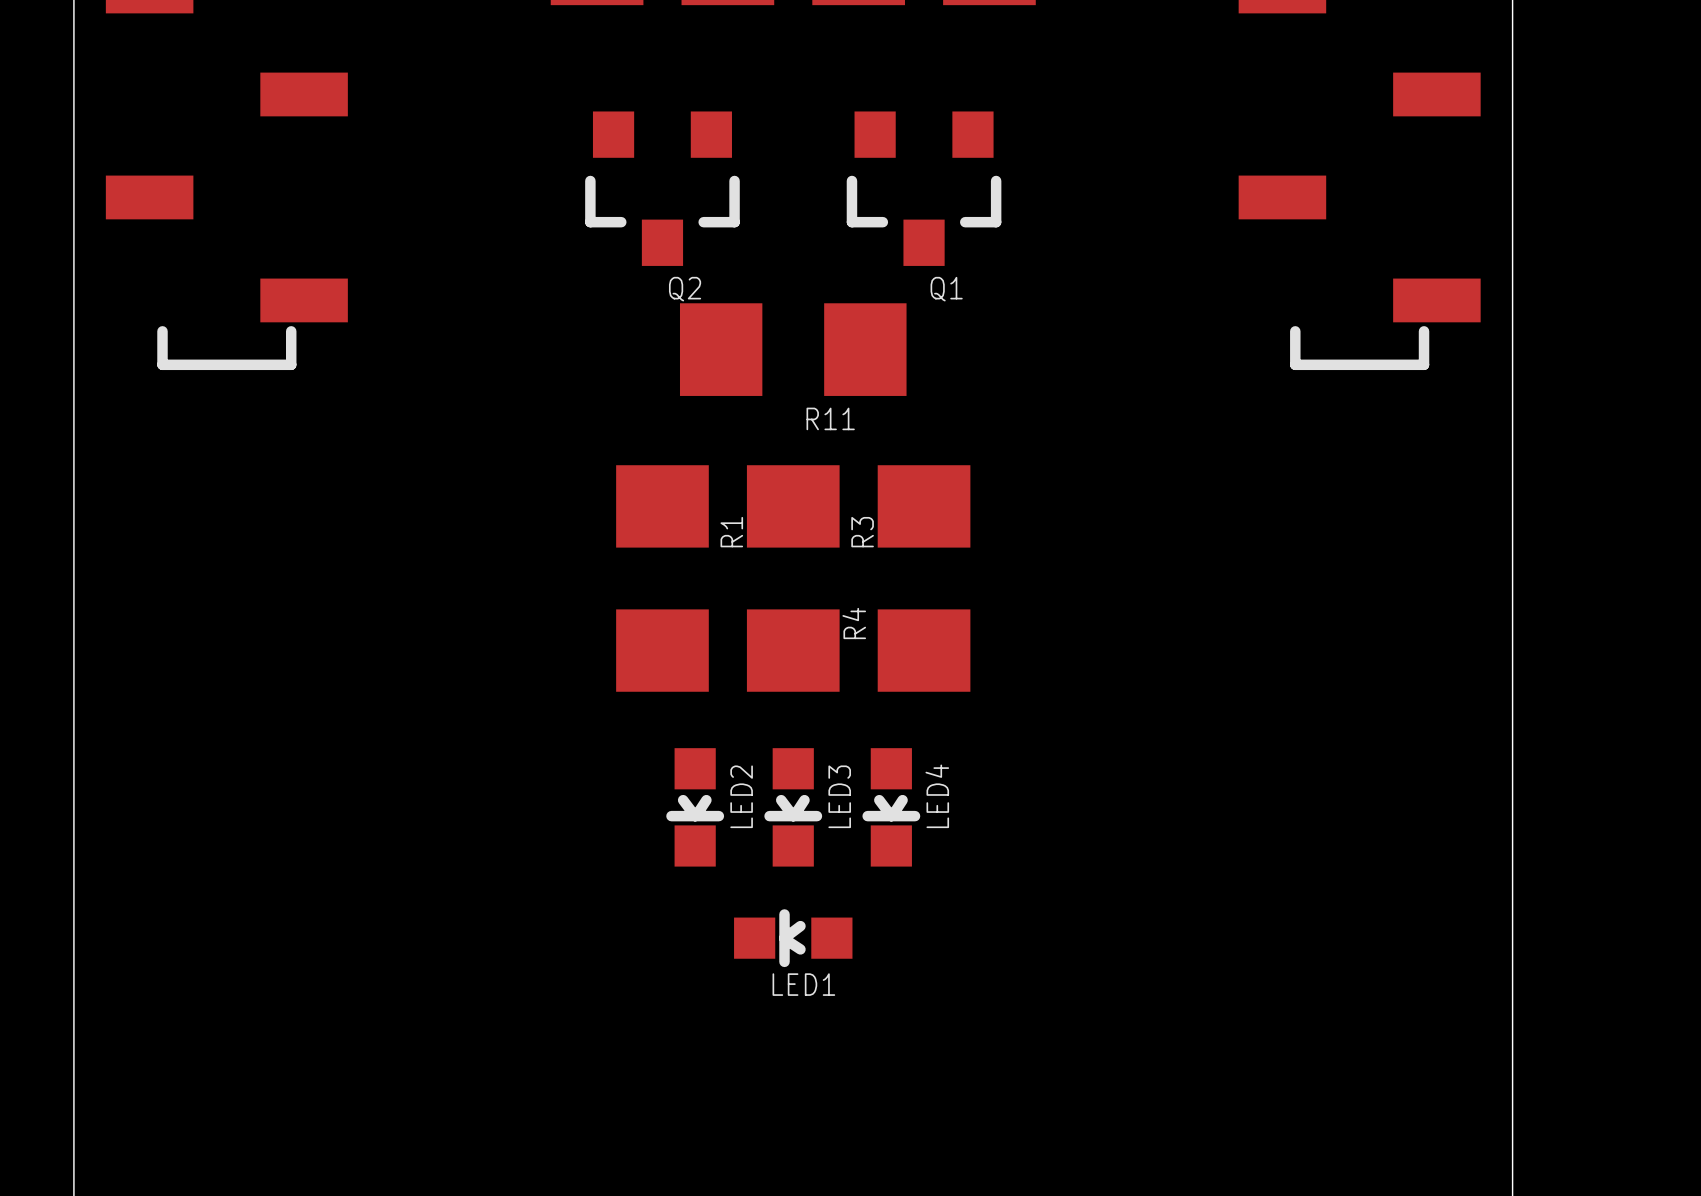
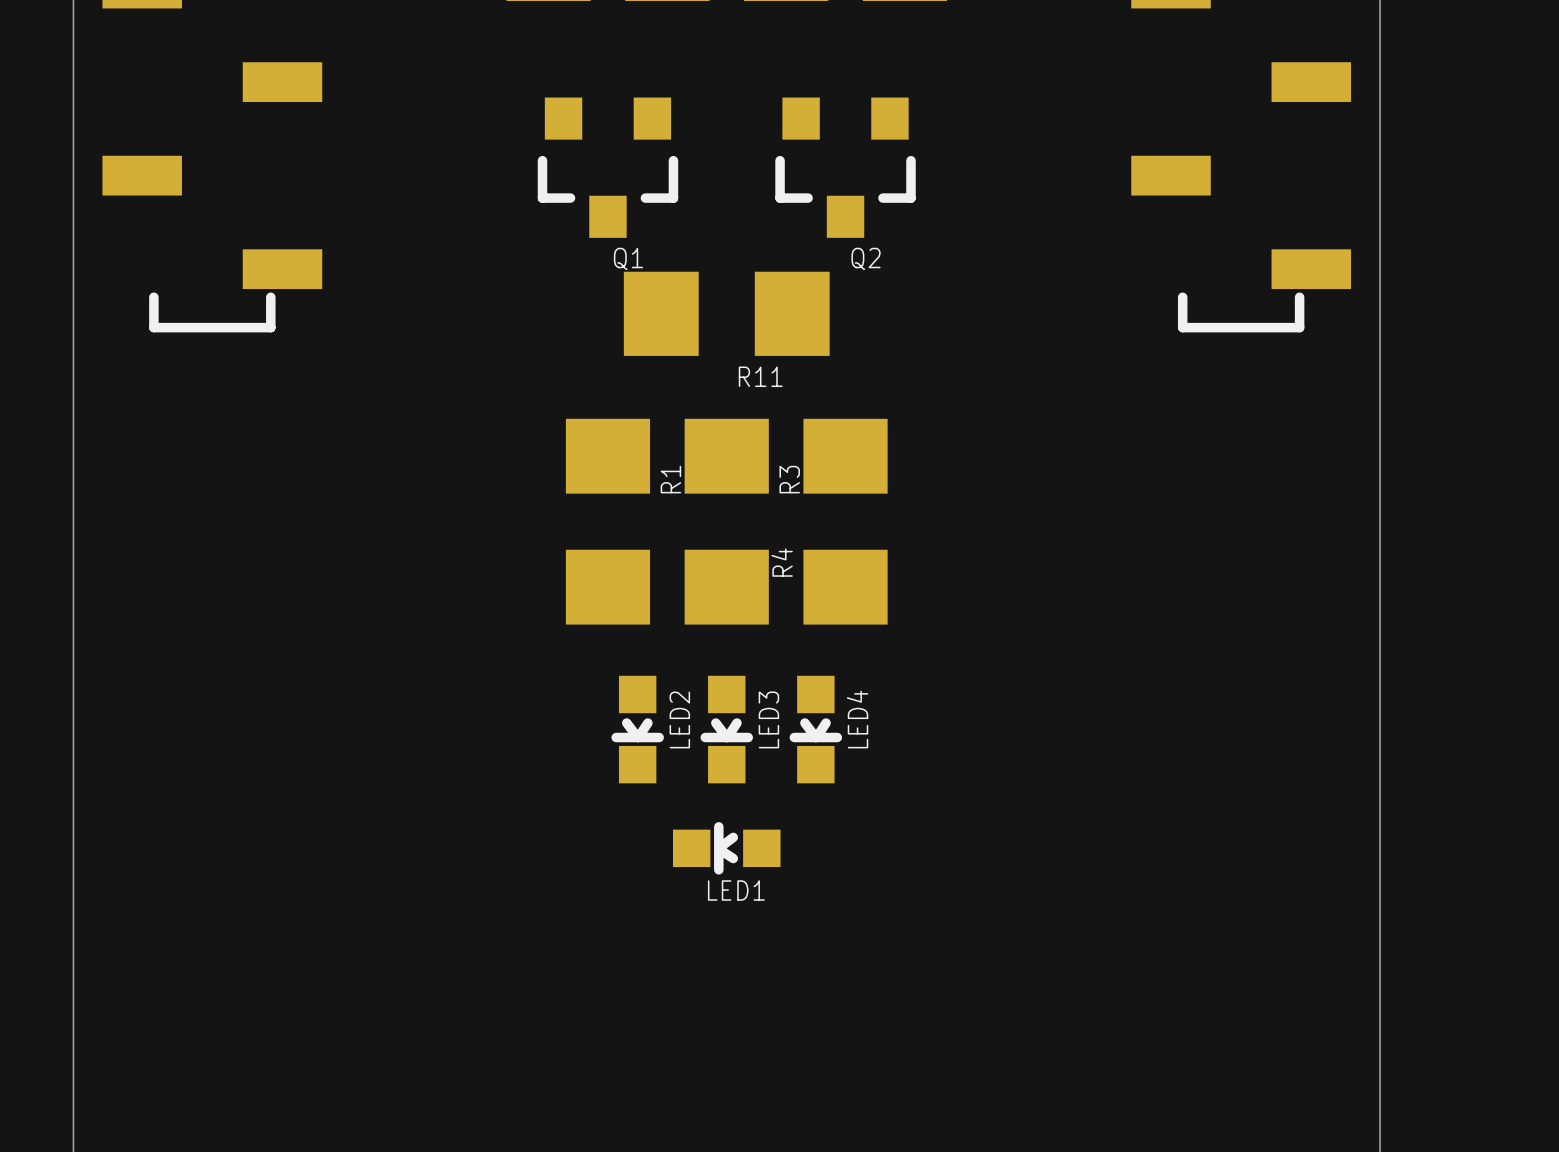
Q2 name: Q2 (685, 289) -> Q1 (628, 258)
Q1 name: Q1 (946, 289) -> Q2 (866, 258)

